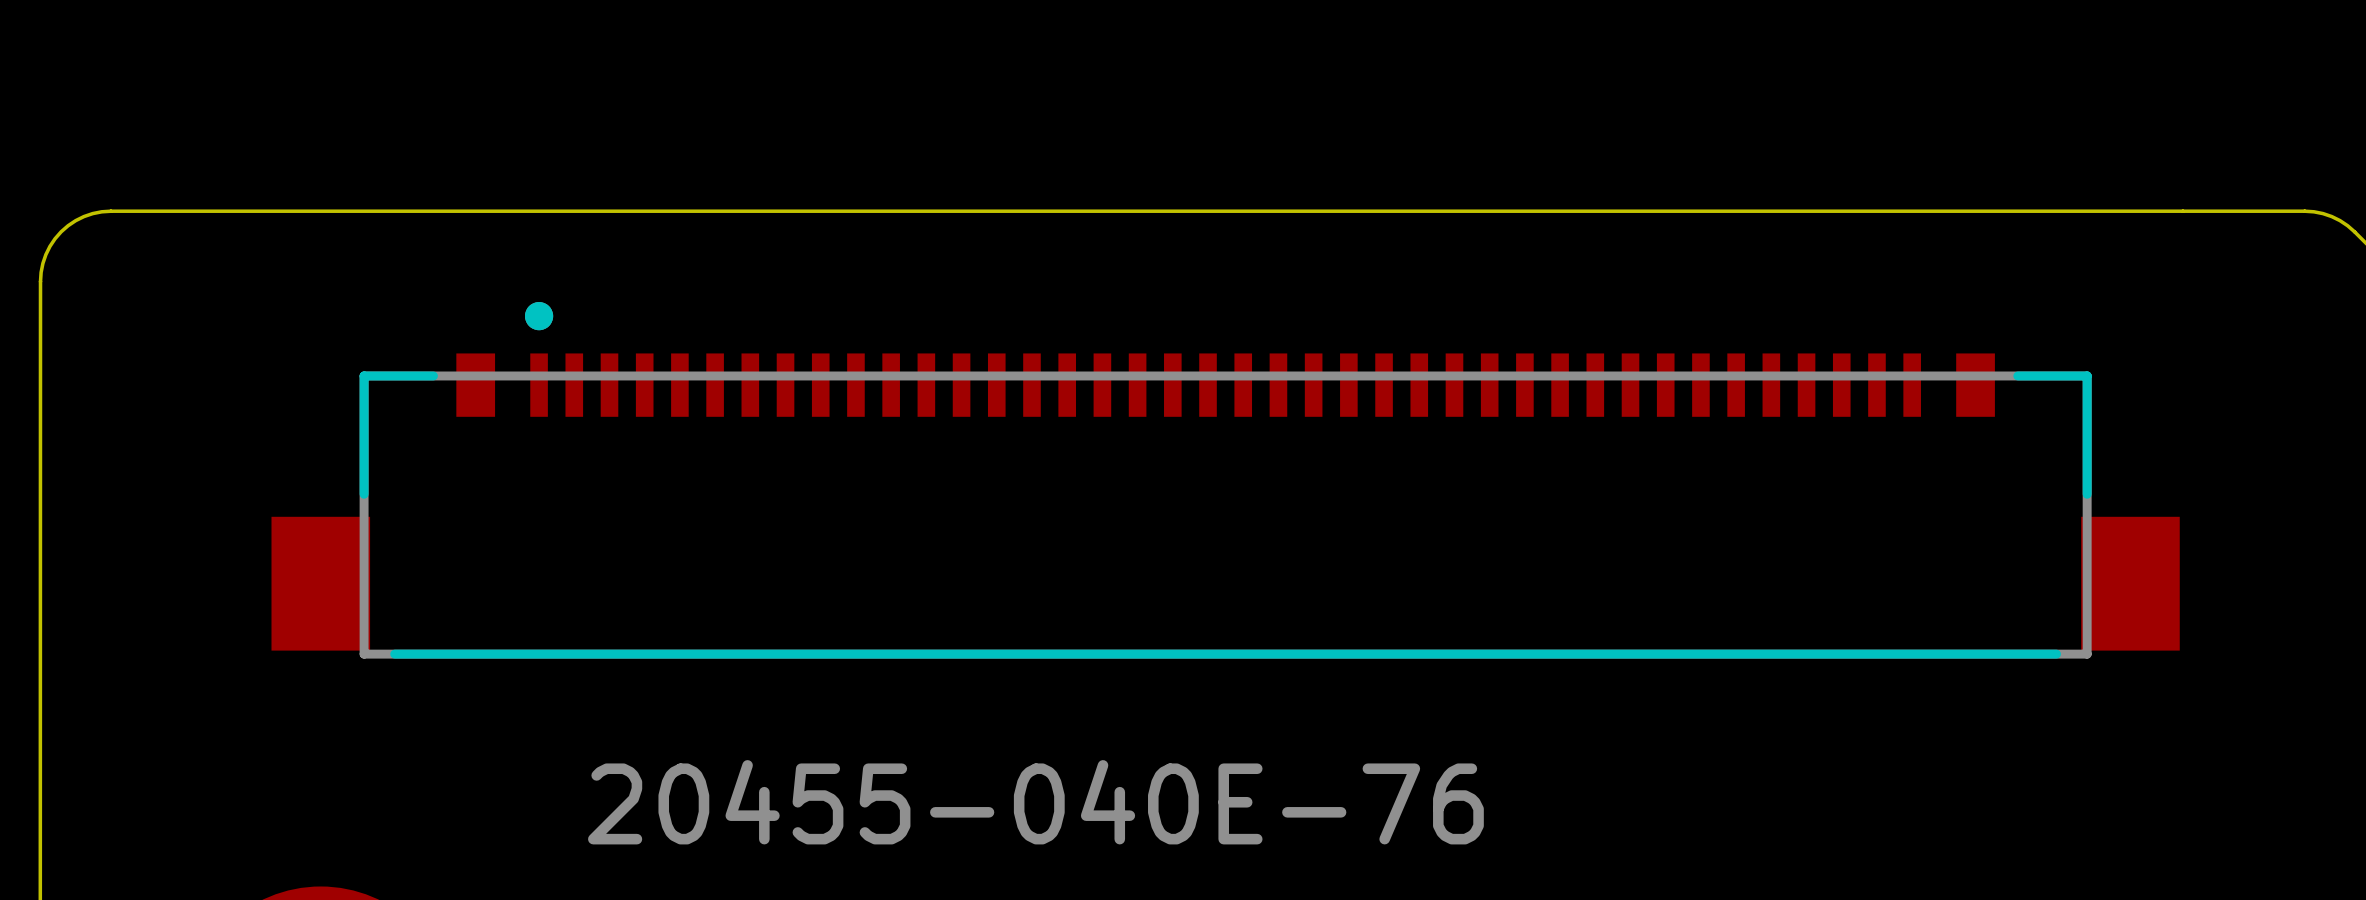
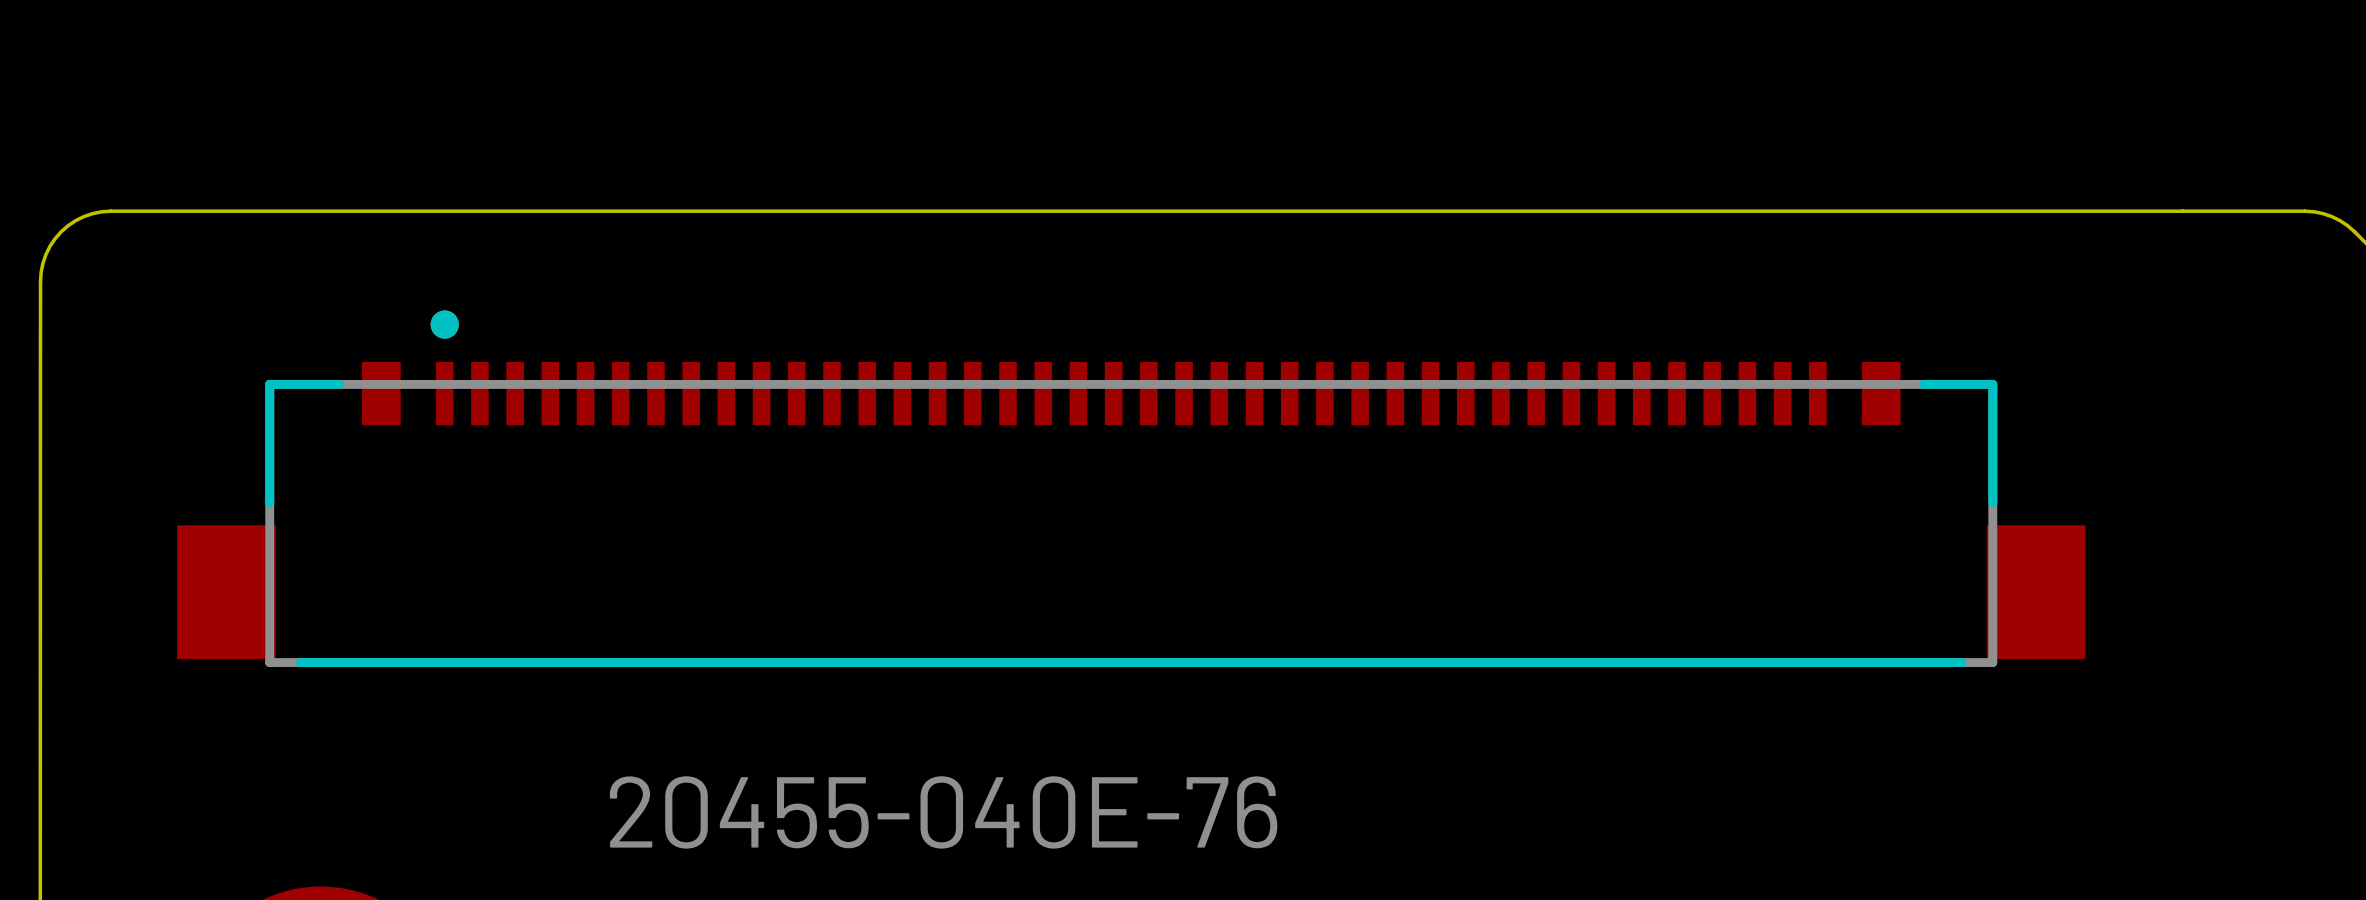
part position: (1225, 480) -> (1131, 488)

